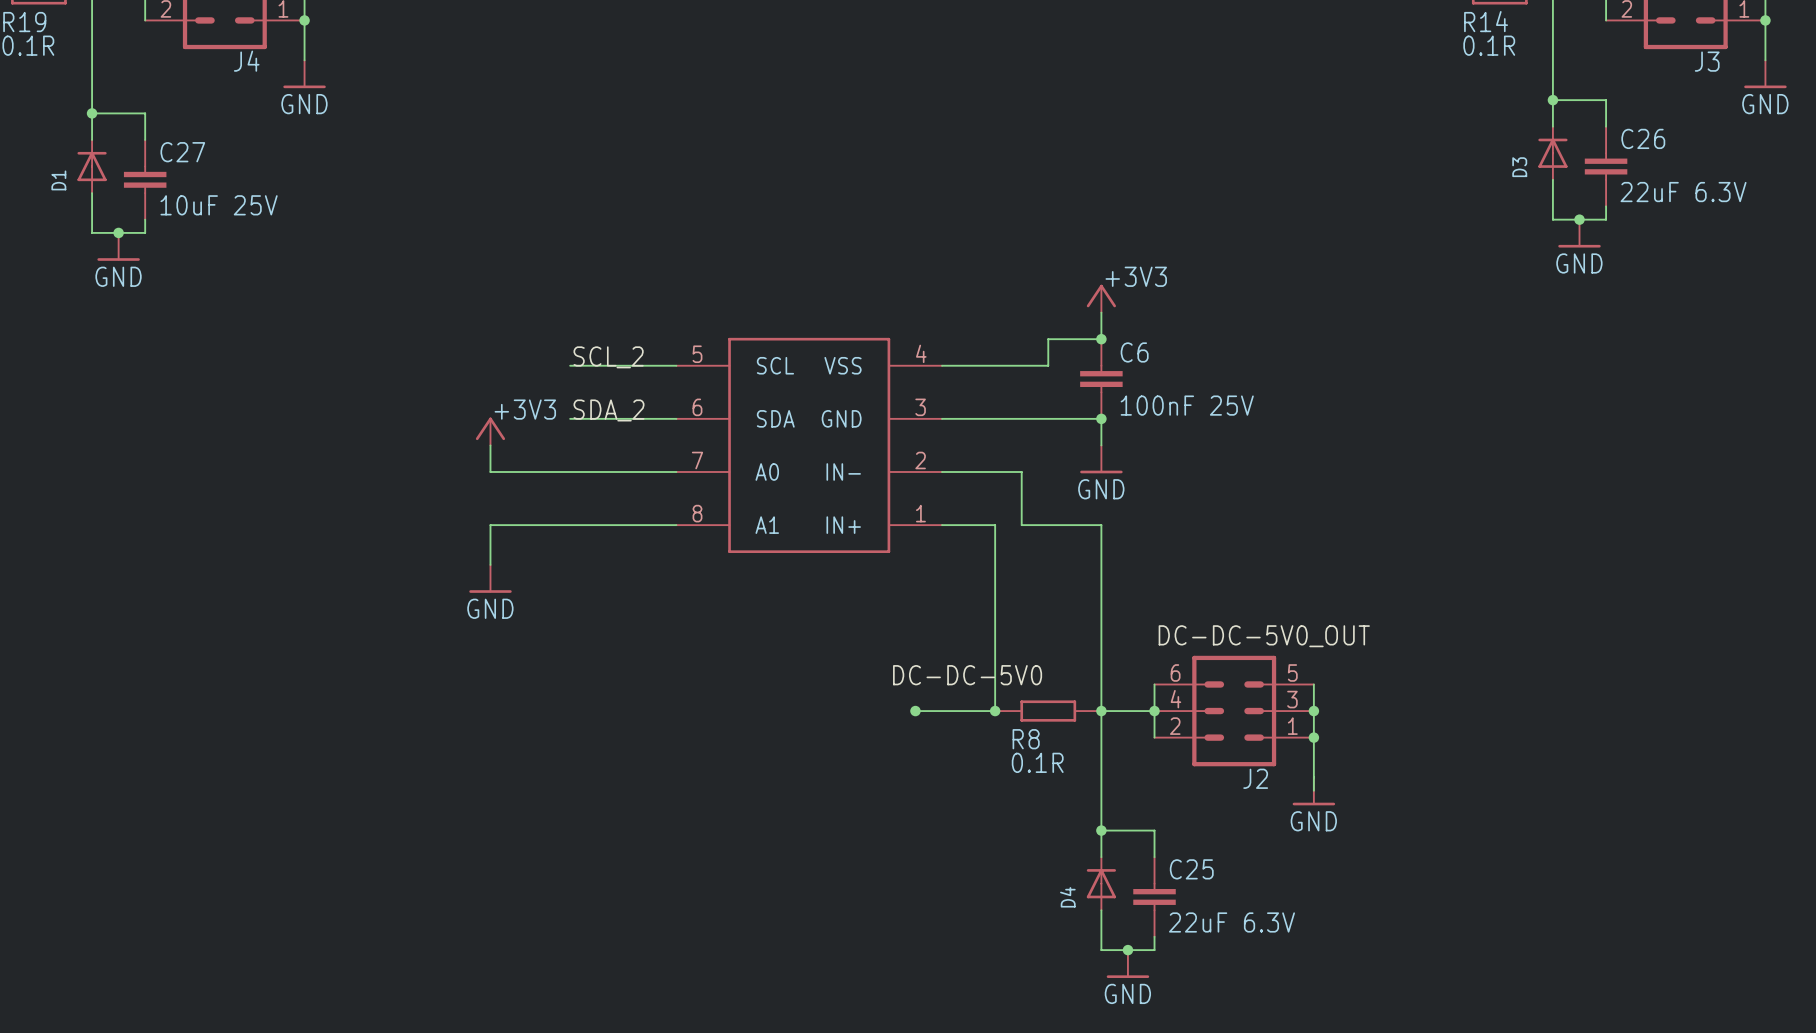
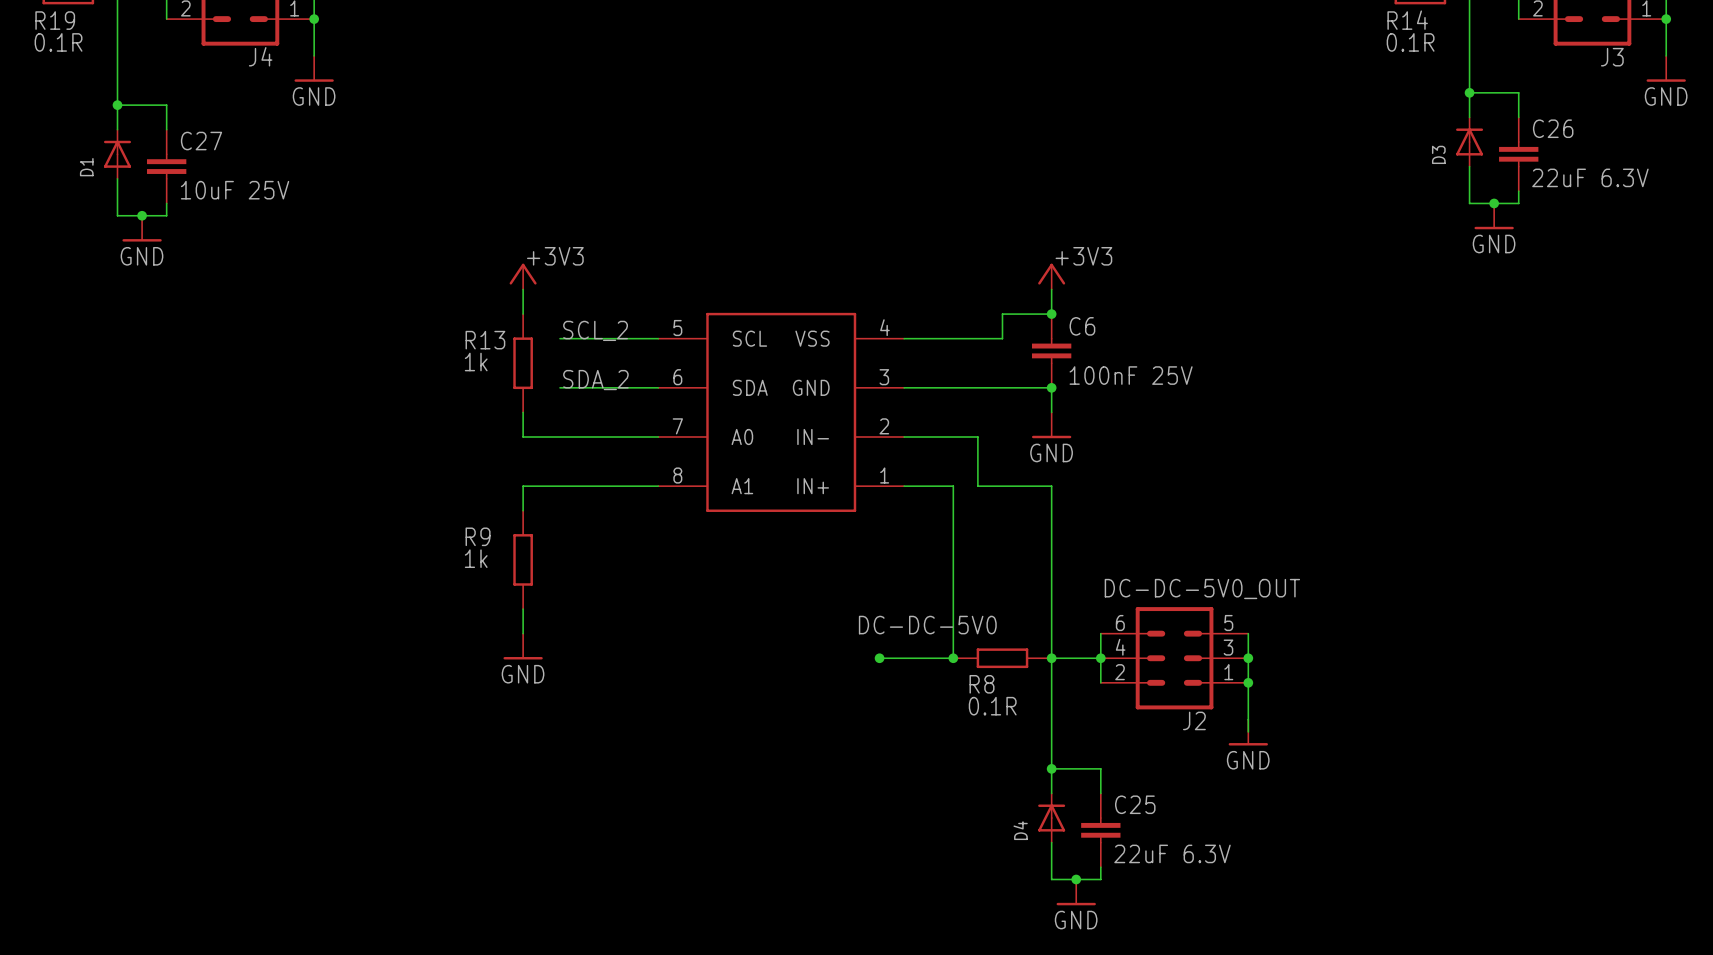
wire: none -> (523, 289) (523, 314)
R13: none -> 1k (523, 363)
power symbol position: +3V3 (490, 431) -> +3V3 (523, 276)
wire: (490, 445) (490, 471) (530, 471) -> (523, 412) (523, 437)
wire: (530, 525) (490, 525) (490, 564) -> (523, 486) (523, 510)
power symbol position: GND (490, 578) -> GND (523, 646)
R9: none -> 1k (523, 559)
wire: none -> (523, 609) (523, 633)

